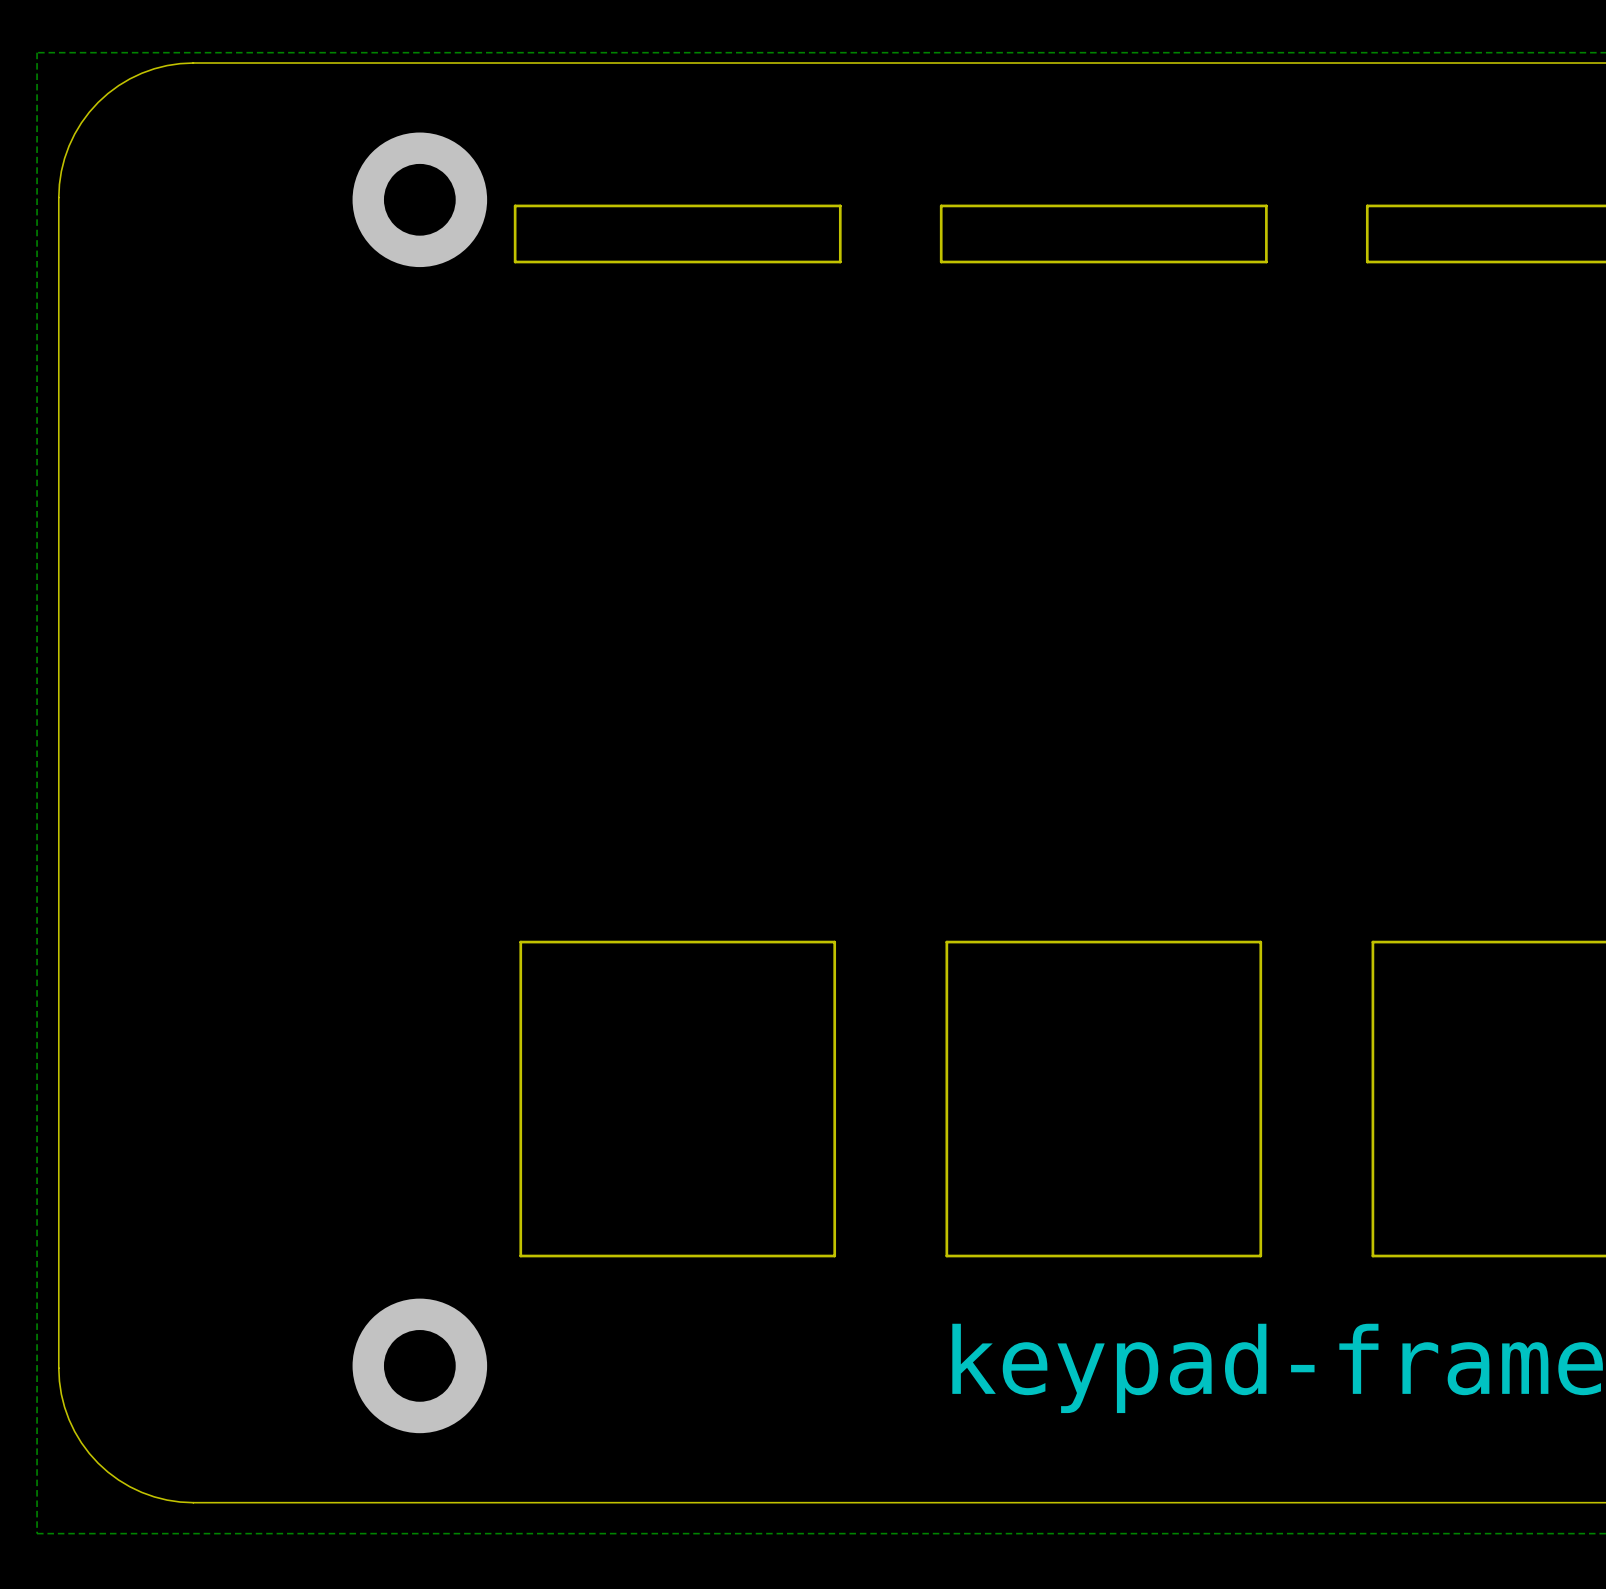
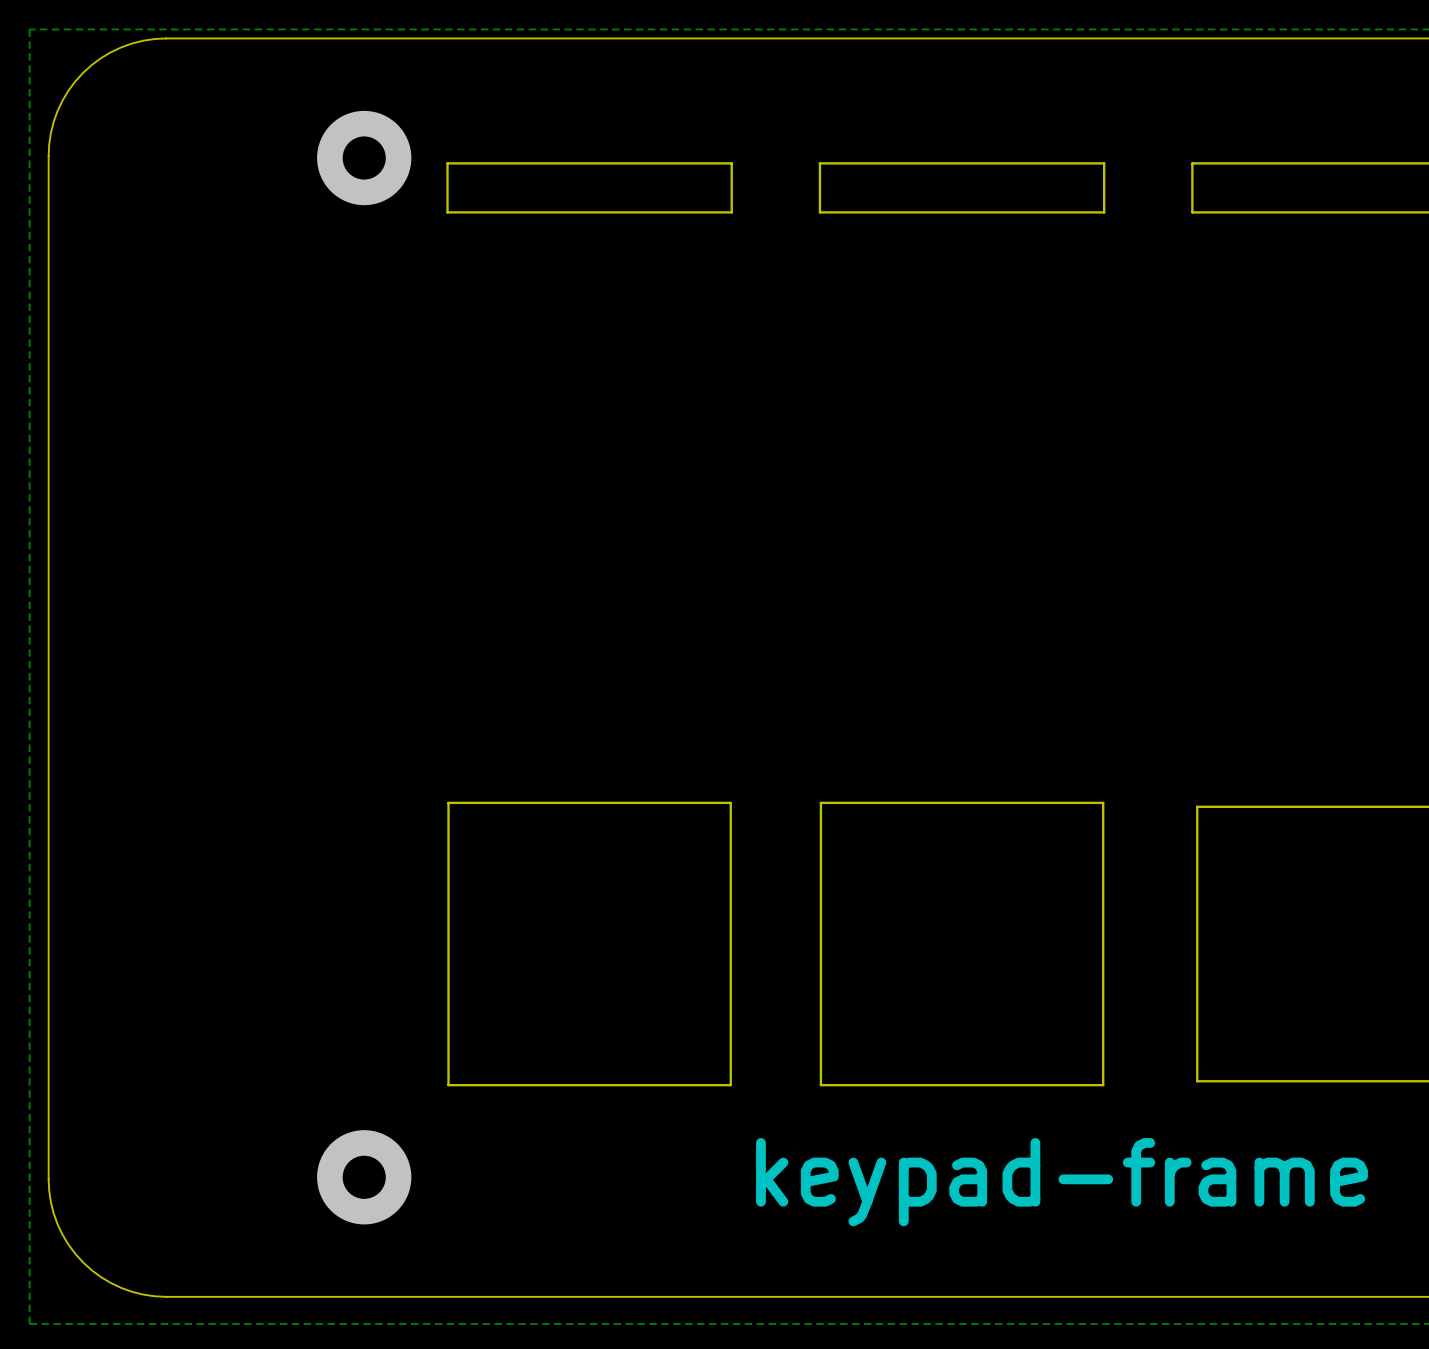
via size: [352, 132, 488, 268] -> [317, 110, 412, 206]
drawing shape: [519, 940, 837, 1258] -> [447, 801, 732, 1087]
drawing shape: [945, 940, 1263, 1258] -> [819, 801, 1105, 1087]
via size: [352, 1298, 488, 1434] -> [317, 1130, 412, 1225]

